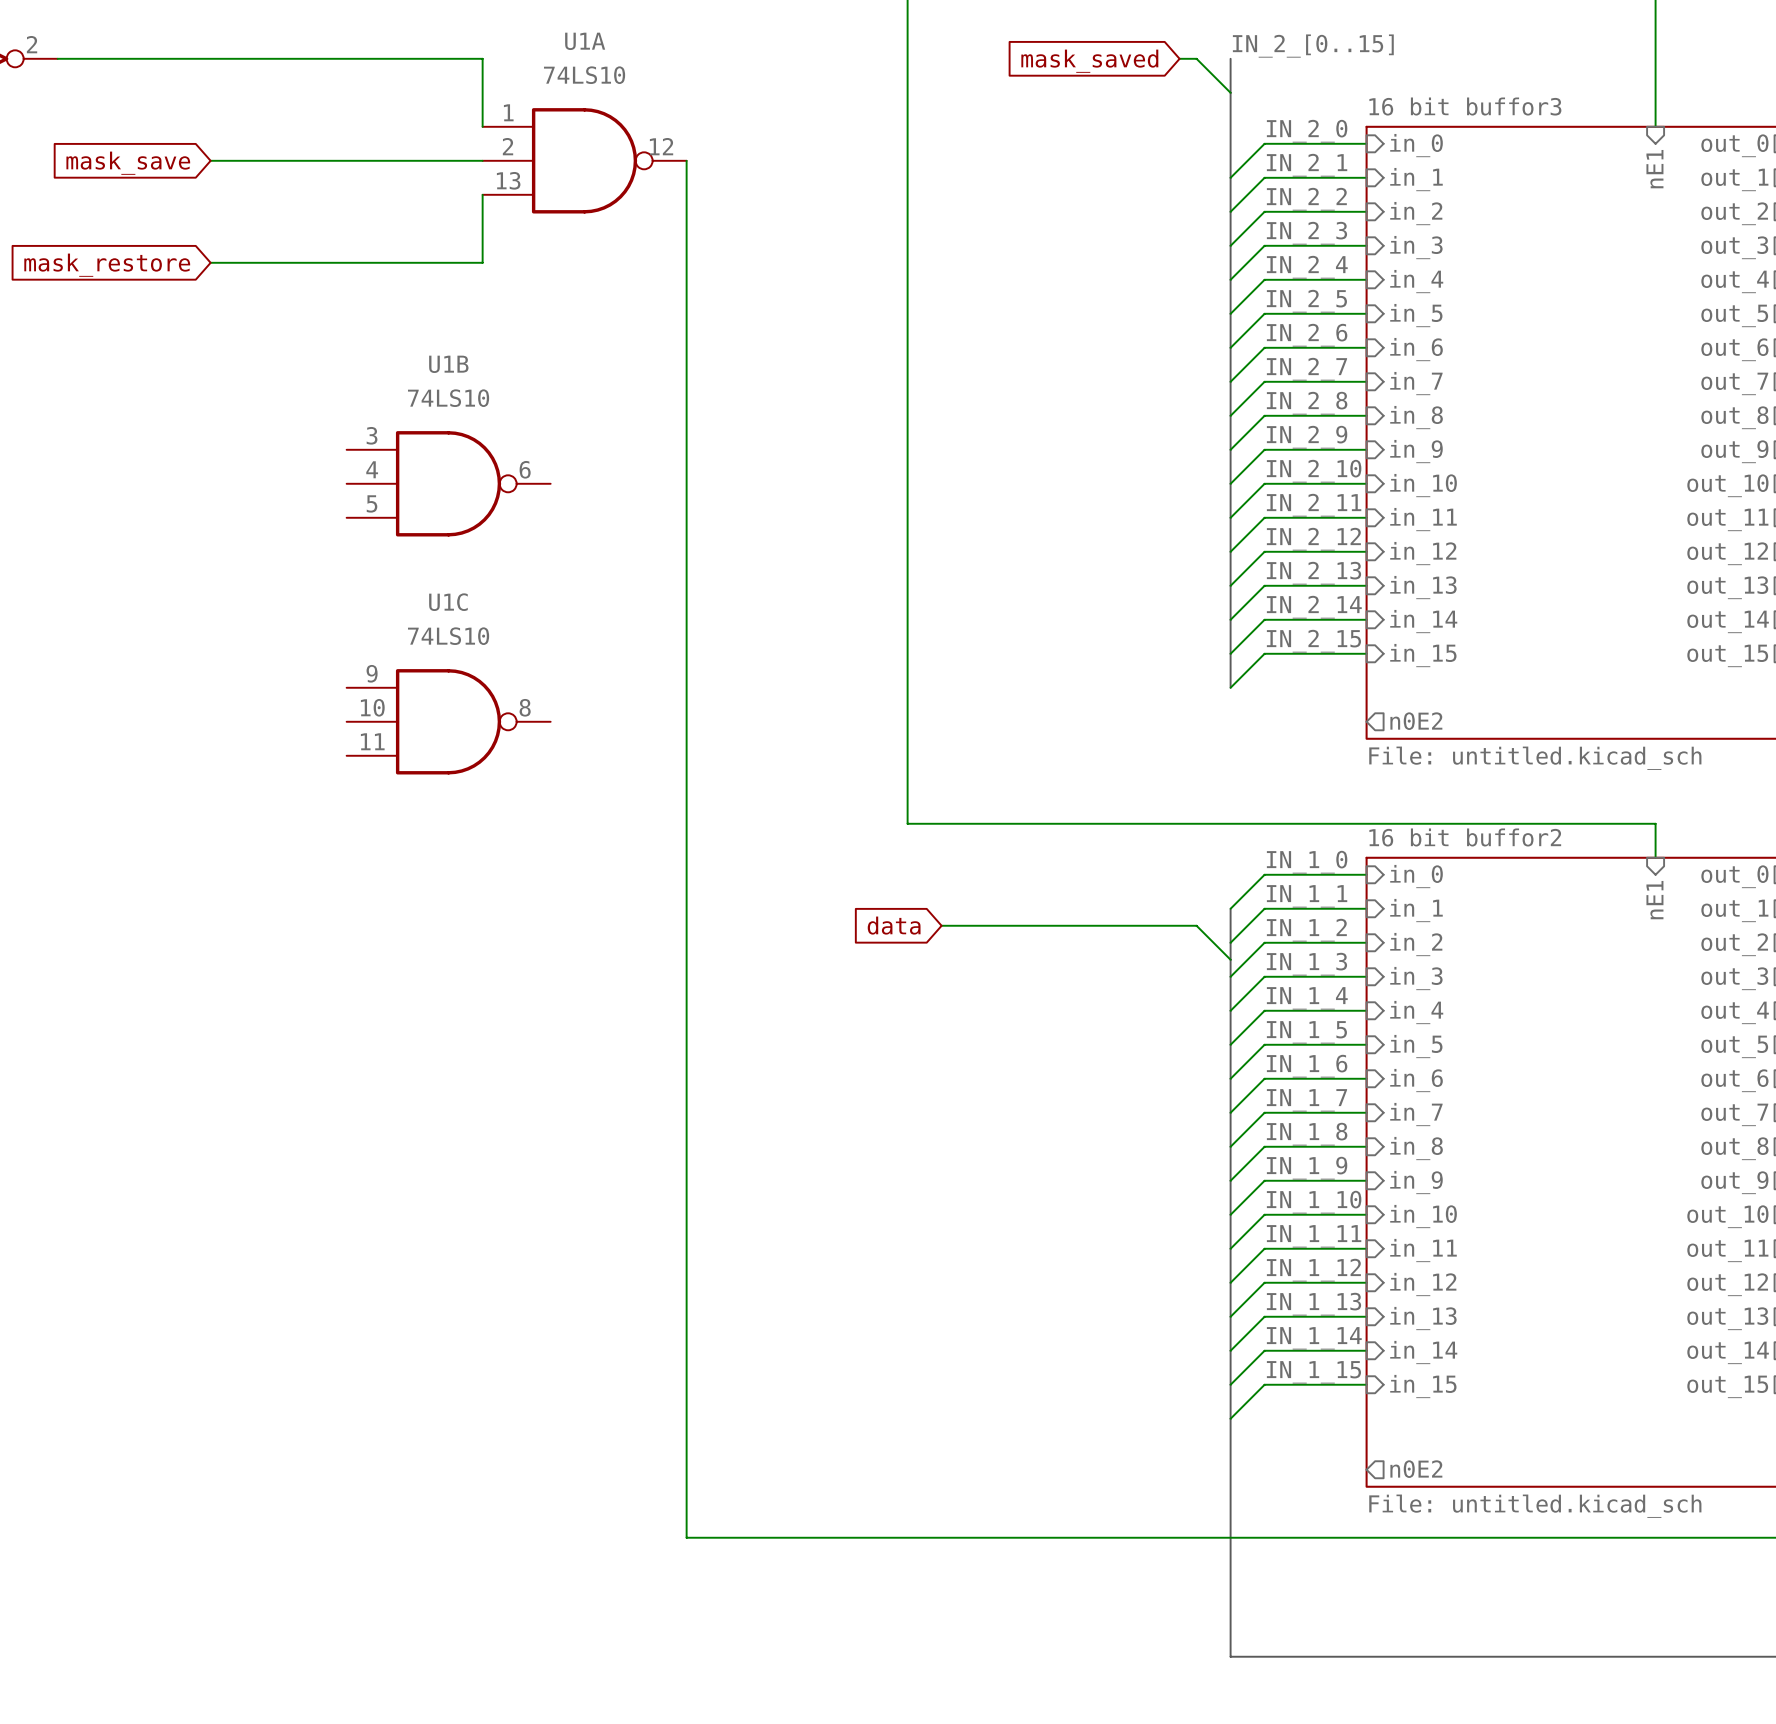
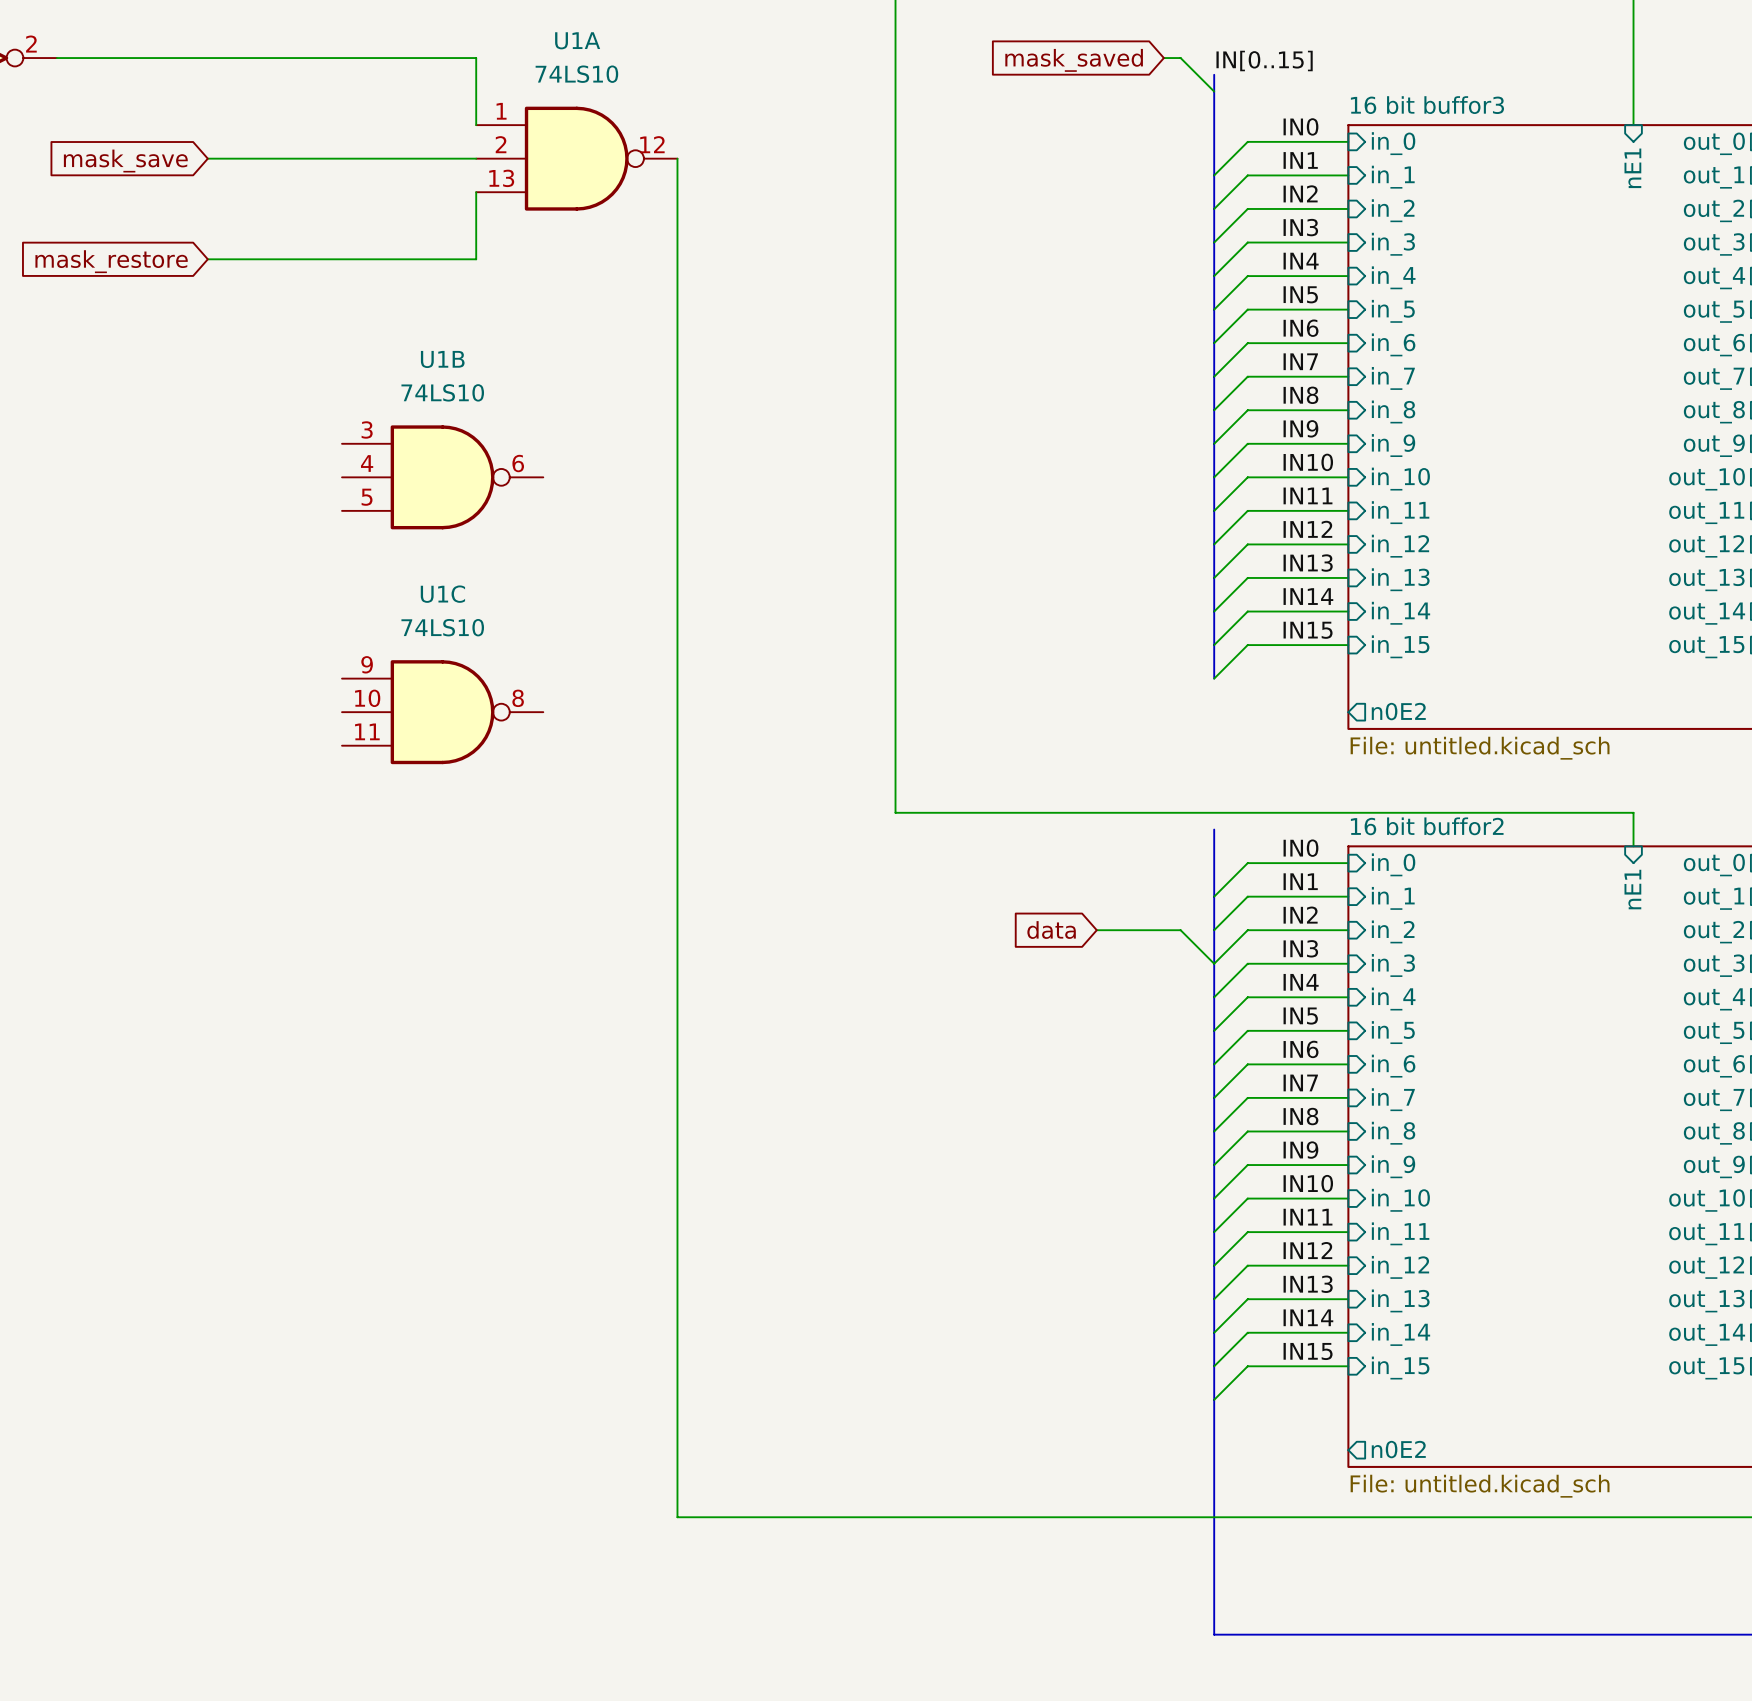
label: IN_2_[0..15] (1313, 46) -> IN[0..15] (1264, 61)
bus: (1230, 58) (1230, 75) -> none
label: IN_2_0 (1307, 131) -> IN0 (1300, 126)
label: none -> IN1 (1300, 160)
label: IN_2_1 (1307, 165) -> none
label: none -> IN2 (1300, 193)
label: IN_2_2 (1306, 199) -> none
label: none -> IN3 (1300, 227)
label: IN_2_3 (1306, 233) -> none
label: IN_2_4 (1307, 267) -> IN4 (1301, 261)
label: IN_2_5 (1306, 301) -> IN5 (1300, 294)
label: IN_2_6 (1307, 335) -> IN6 (1301, 328)
label: IN_2_7 (1306, 369) -> IN7 (1300, 361)
label: IN_2_8 (1307, 403) -> IN8 (1300, 395)
label: IN_2_9 (1307, 437) -> IN9 (1300, 428)
label: IN_2_10 (1314, 471) -> IN10 (1308, 462)
label: IN_2_11 (1314, 505) -> IN11 (1307, 495)
label: IN_2_12 (1313, 539) -> IN12 (1307, 529)
label: IN_2_13 (1314, 573) -> IN13 (1308, 563)
label: IN_2_14 (1314, 607) -> IN14 (1308, 596)
label: IN_2_15 (1313, 641) -> IN15 (1308, 630)
bus: none -> (1214, 829) (1214, 896)
label: none -> IN0 (1300, 848)
label: IN_1_0 (1307, 862) -> none
label: none -> IN1 (1300, 881)
label: IN_1_1 (1307, 896) -> none
global label position: data (894, 925) -> data (1051, 930)
wire: (941, 925) (1196, 925) (1230, 959) -> none
label: none -> IN2 (1300, 915)
label: IN_1_2 (1306, 930) -> none
wire: none -> (1096, 930) (1180, 930) (1214, 963)
label: IN_1_3 (1306, 964) -> IN3 (1300, 948)
label: IN_1_4 (1307, 998) -> IN4 (1301, 982)
label: IN_1_5 (1306, 1032) -> IN5 (1300, 1016)
label: IN_1_6 (1307, 1066) -> IN6 (1301, 1049)
label: IN_1_7 (1306, 1100) -> IN7 (1300, 1082)
label: IN_1_8 (1307, 1134) -> IN8 (1300, 1116)
label: IN_1_9 (1307, 1168) -> IN9 (1300, 1150)
label: none -> IN10 (1308, 1183)
label: IN_1_10 (1314, 1202) -> none
label: none -> IN11 (1307, 1217)
label: IN_1_11 (1314, 1236) -> none
label: none -> IN12 (1307, 1250)
label: IN_1_12 (1313, 1270) -> none
label: IN_1_13 (1314, 1304) -> IN13 (1308, 1284)
label: IN_1_14 (1314, 1338) -> IN14 (1308, 1317)
label: IN_1_15 (1313, 1372) -> IN15 (1308, 1351)

